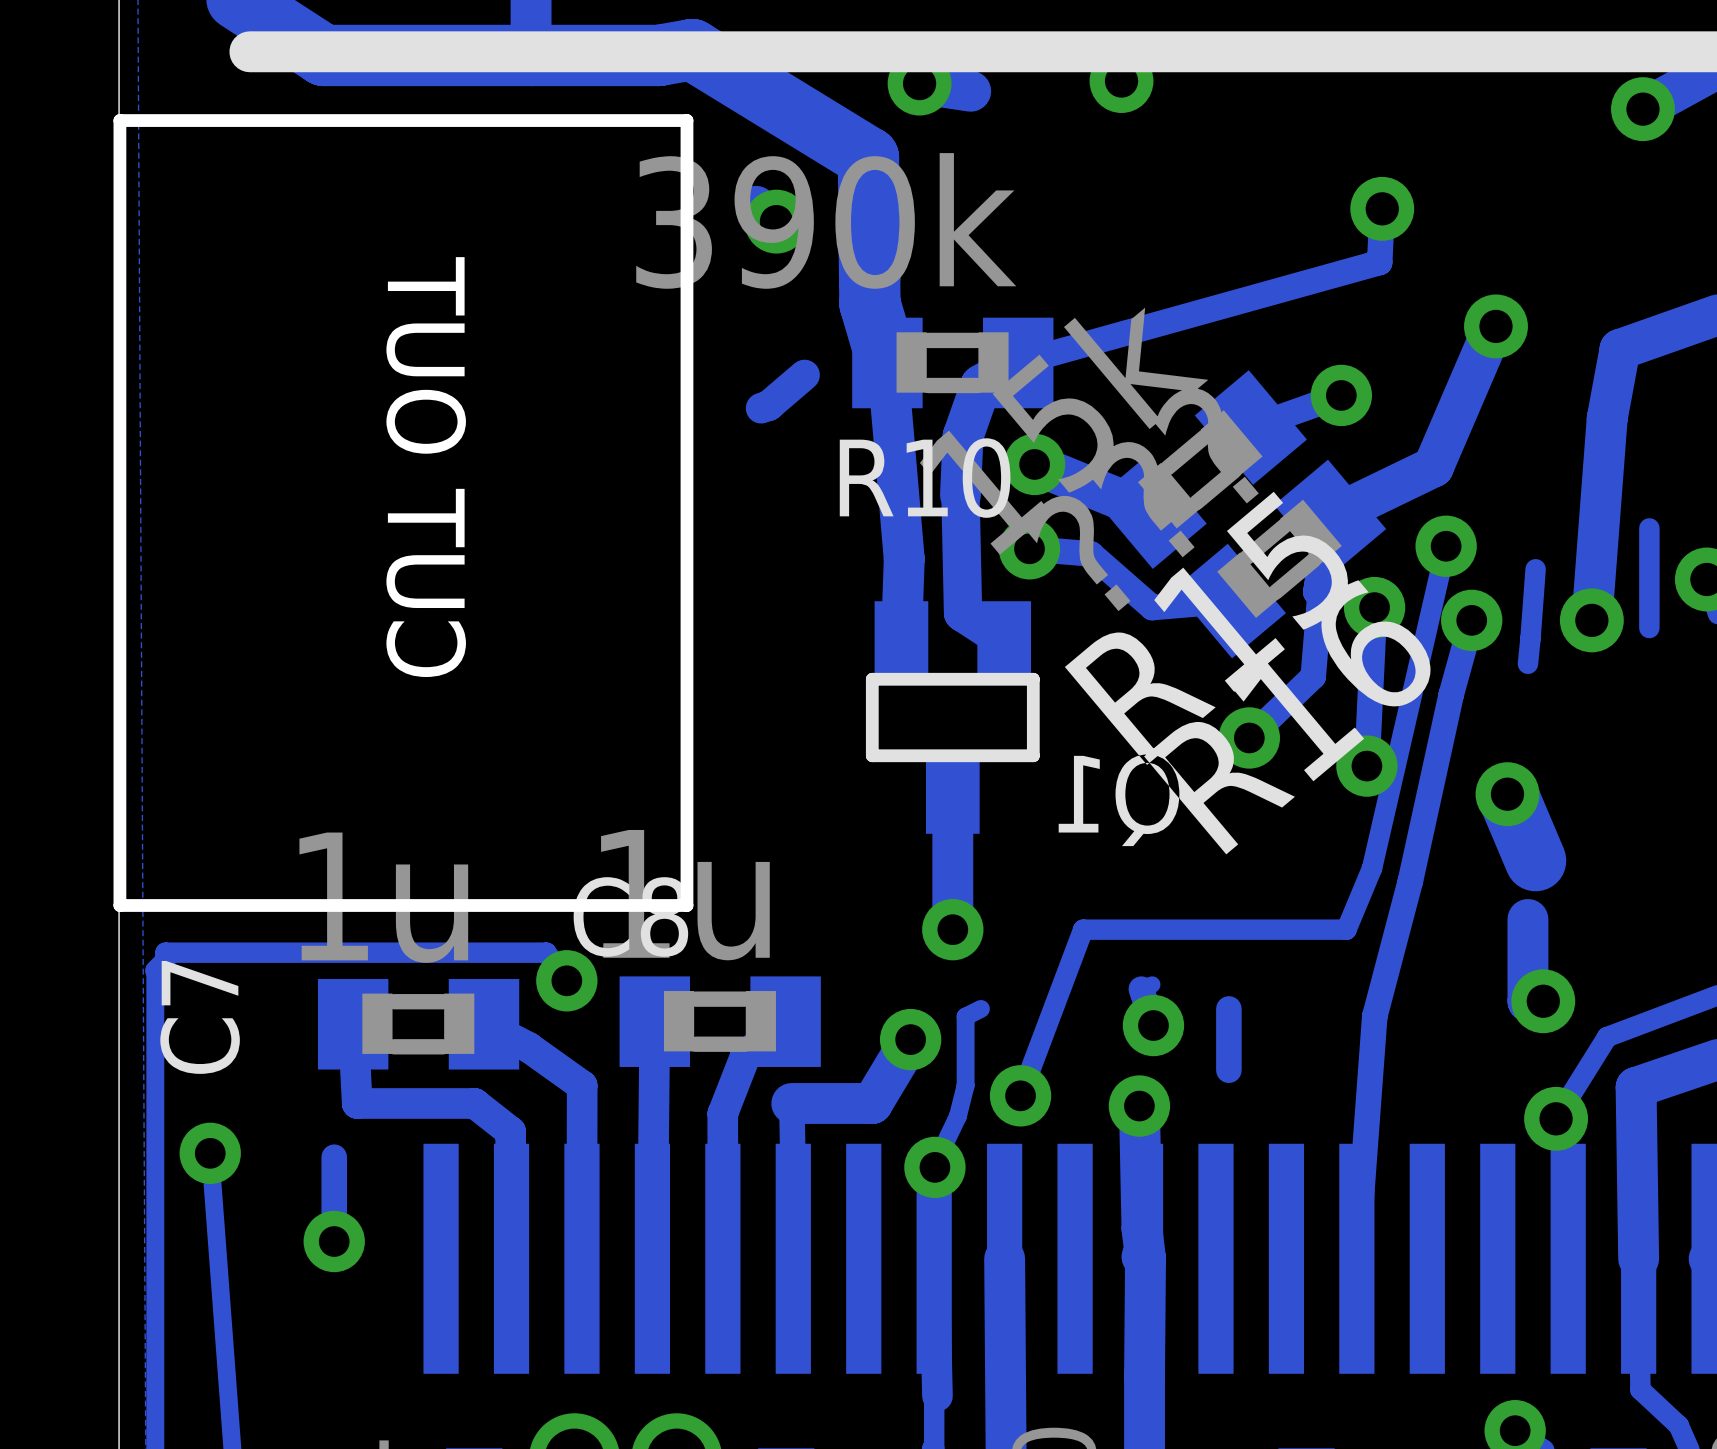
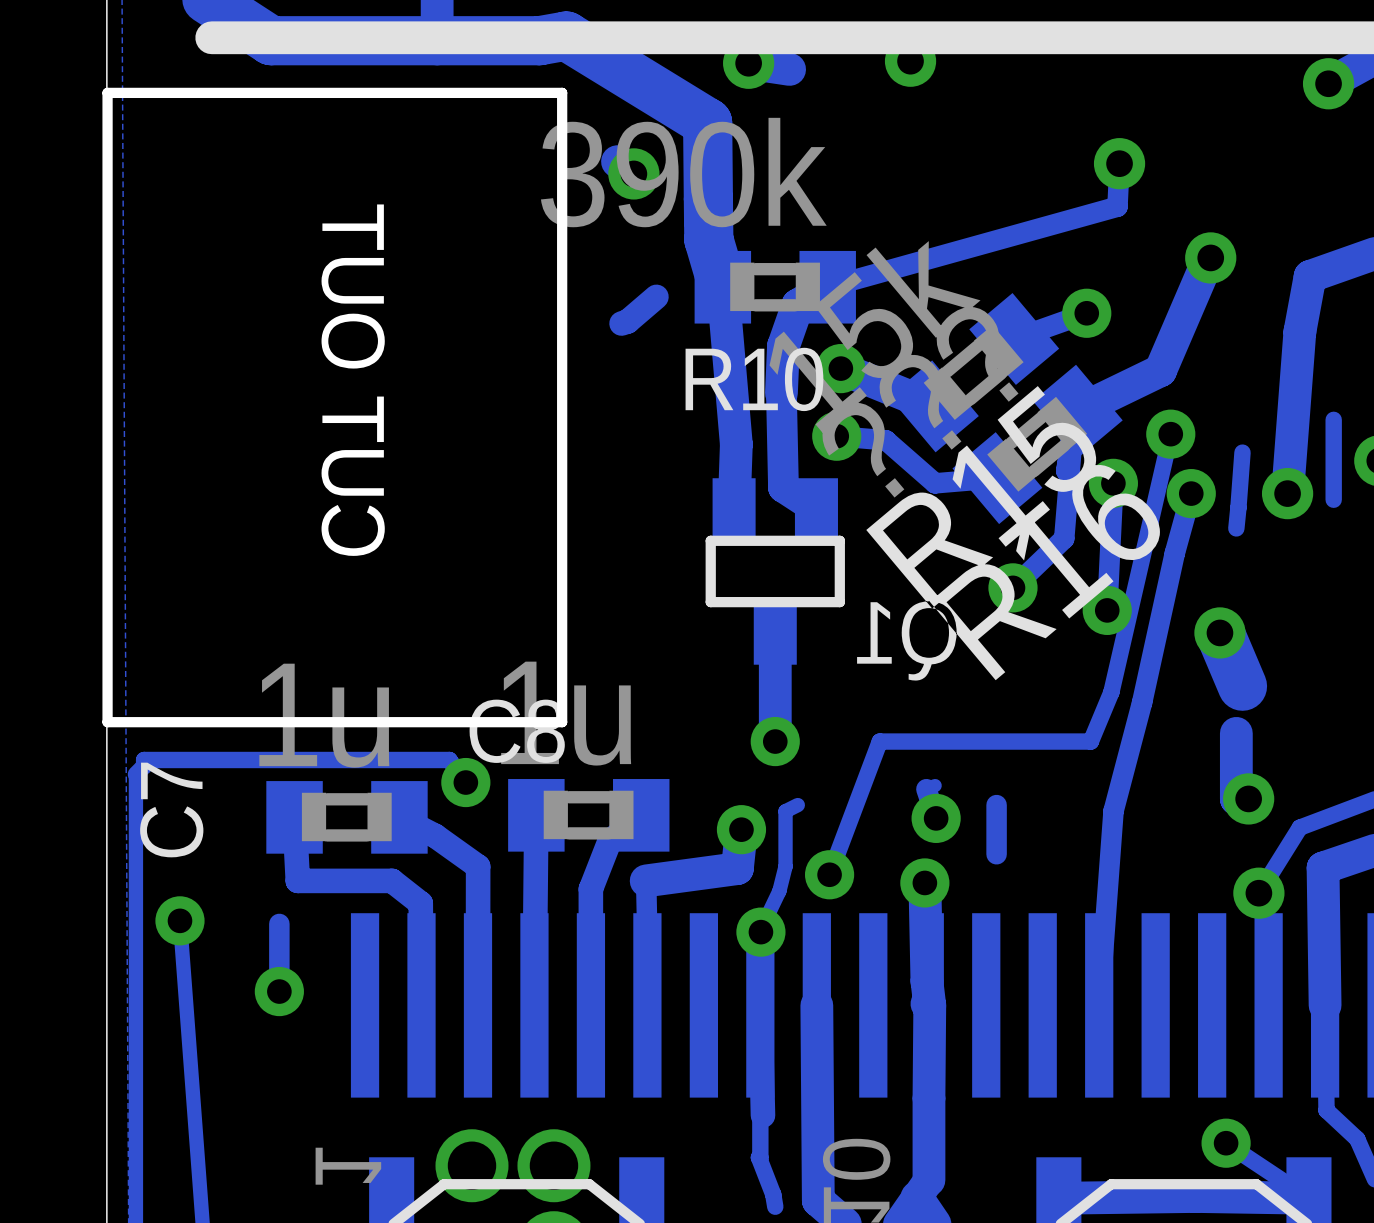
track: (910, 1039) (872, 1103) (791, 1103) -> (741, 829) (737, 868) (646, 880)

